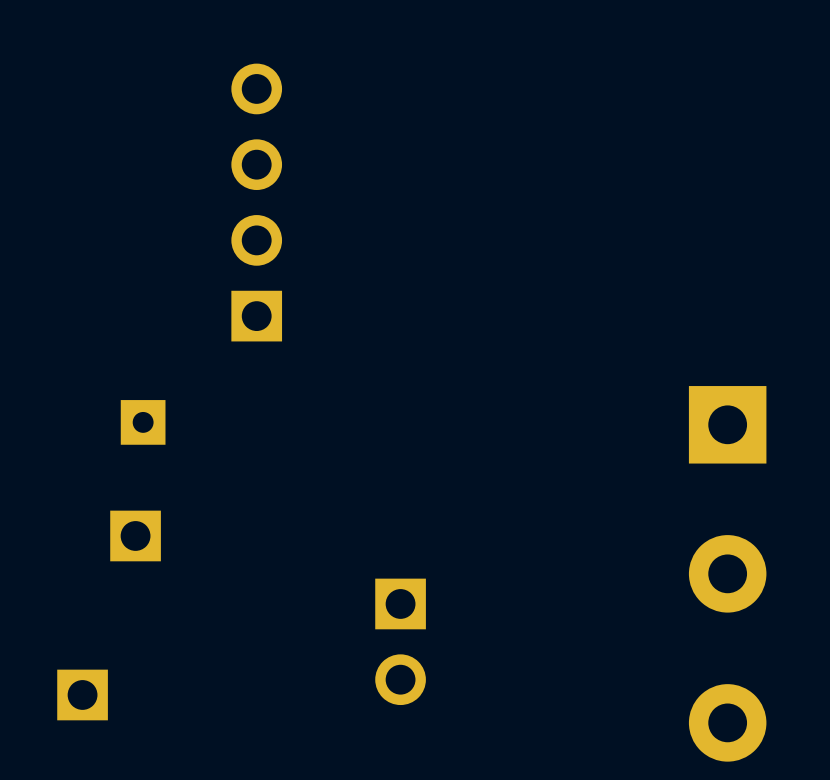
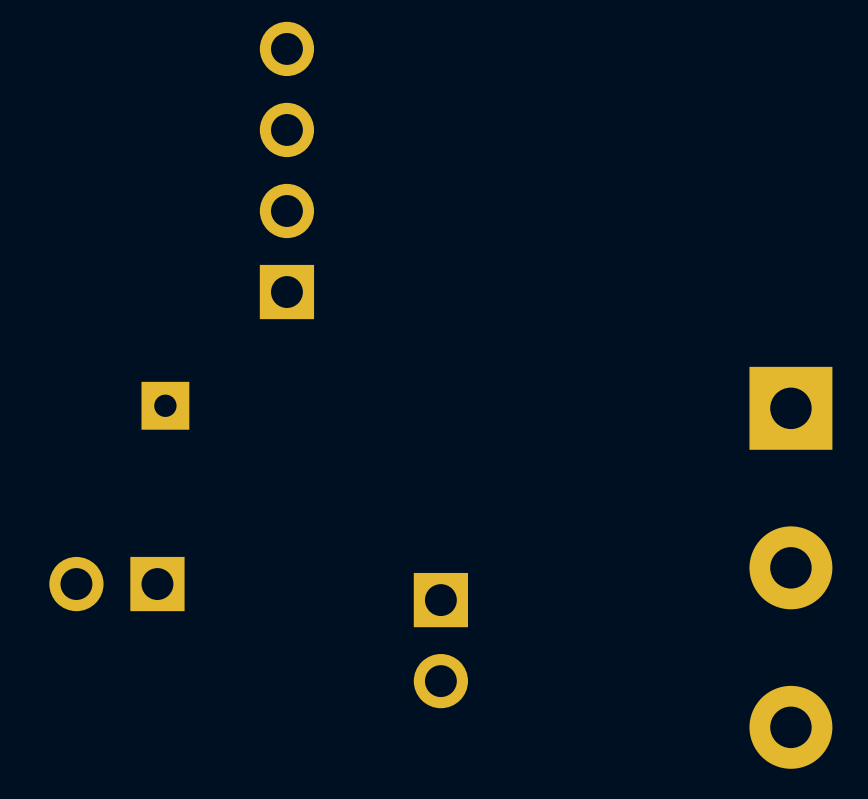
part: (135, 535) -> none
part: none -> (116, 584)
part: (82, 694) -> none

